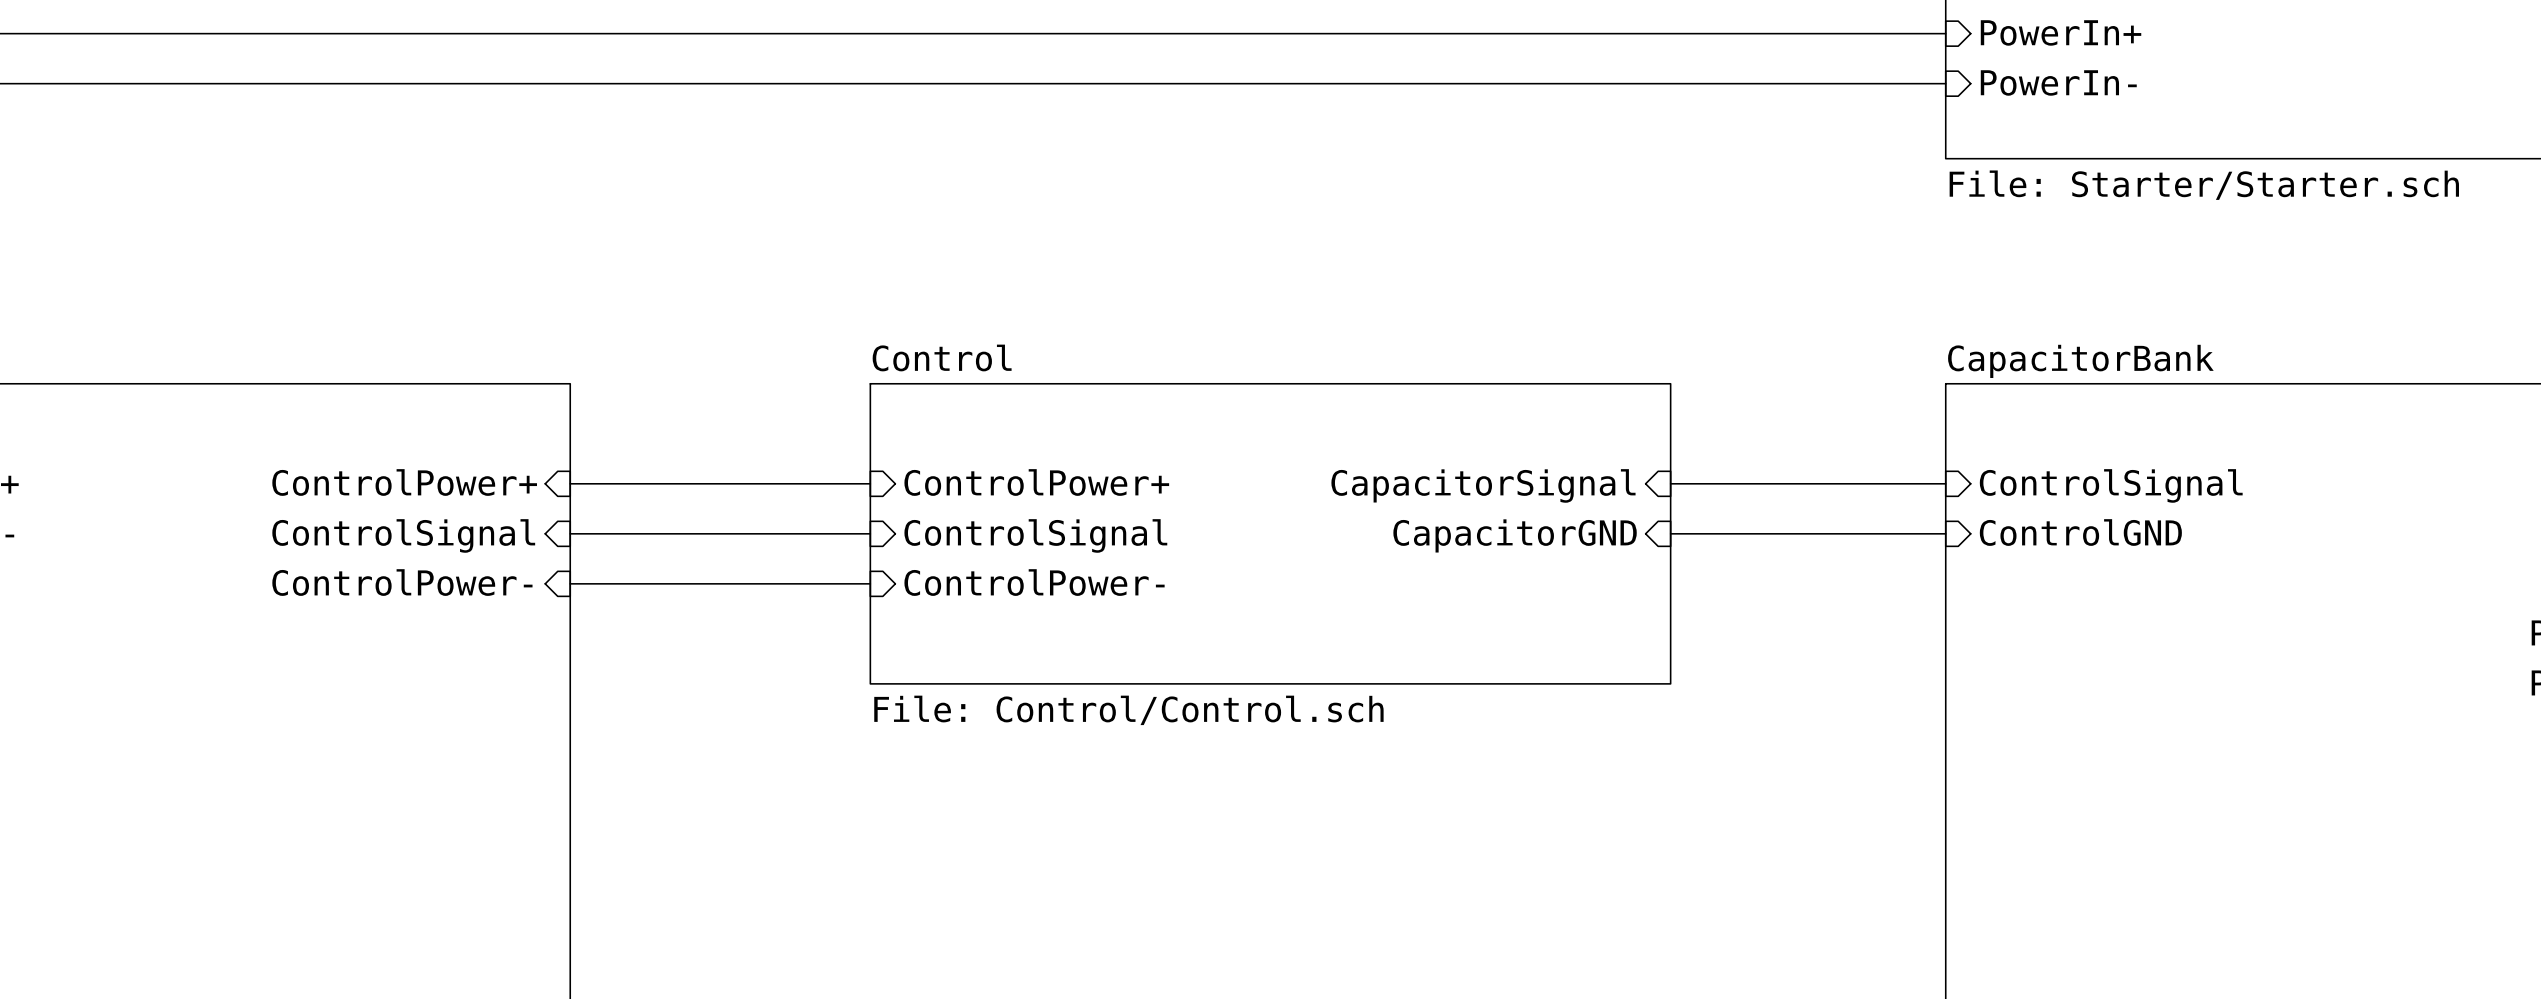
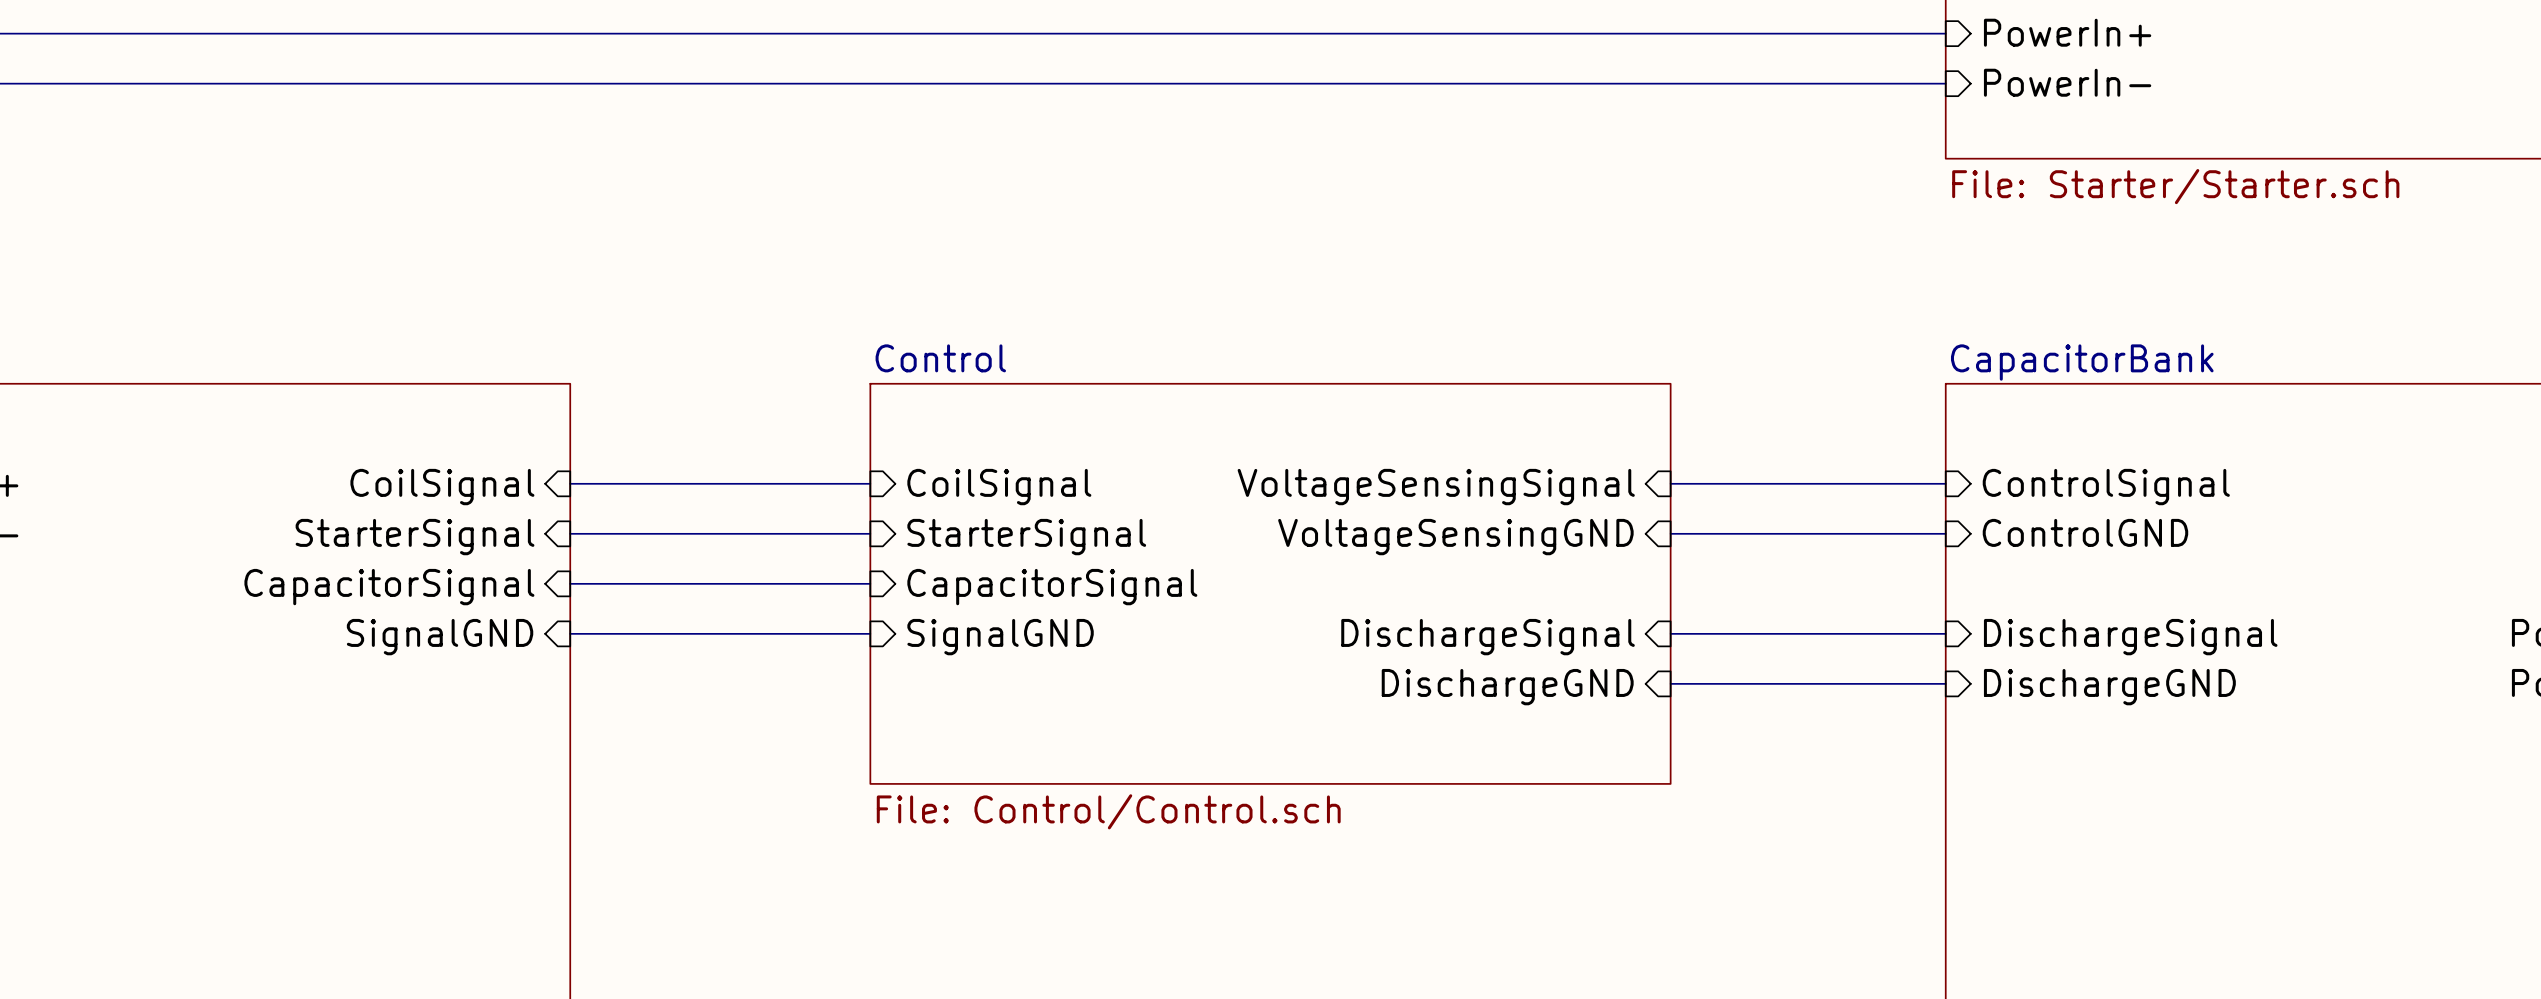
sheet pin: ControlPower+ (404, 482) -> CoilSignal (442, 487)
sheet pin: ControlPower+ (1036, 482) -> CoilSignal (999, 487)
sheet pin: CapacitorSignal (1483, 485) -> VoltageSensingSignal (1436, 487)
sheet Control: File: Control/Control.sch (1270, 533) -> none
sheet pin: ControlSignal (403, 535) -> StarterSignal (415, 537)
sheet pin: ControlSignal (1035, 535) -> StarterSignal (1026, 537)
sheet pin: CapacitorGND (1515, 535) -> VoltageSensingGND (1455, 537)
sheet pin: ControlPower- (402, 582) -> CapacitorSignal (389, 587)
sheet pin: ControlPower- (1034, 582) -> CapacitorSignal (1052, 587)
sheet Control: none -> File: Control/Control.sch (1270, 583)
wire: none -> (570, 633) (870, 633)
wire: none -> (1670, 633) (1945, 633)
sheet pin: none -> SignalGND (440, 637)
sheet pin: none -> SignalGND (1000, 637)
sheet pin: none -> DischargeSignal (1488, 637)
sheet pin: none -> DischargeSignal (2130, 637)
wire: none -> (1670, 683) (1945, 683)
sheet pin: none -> DischargeGND (1507, 687)
sheet pin: none -> DischargeGND (2109, 687)

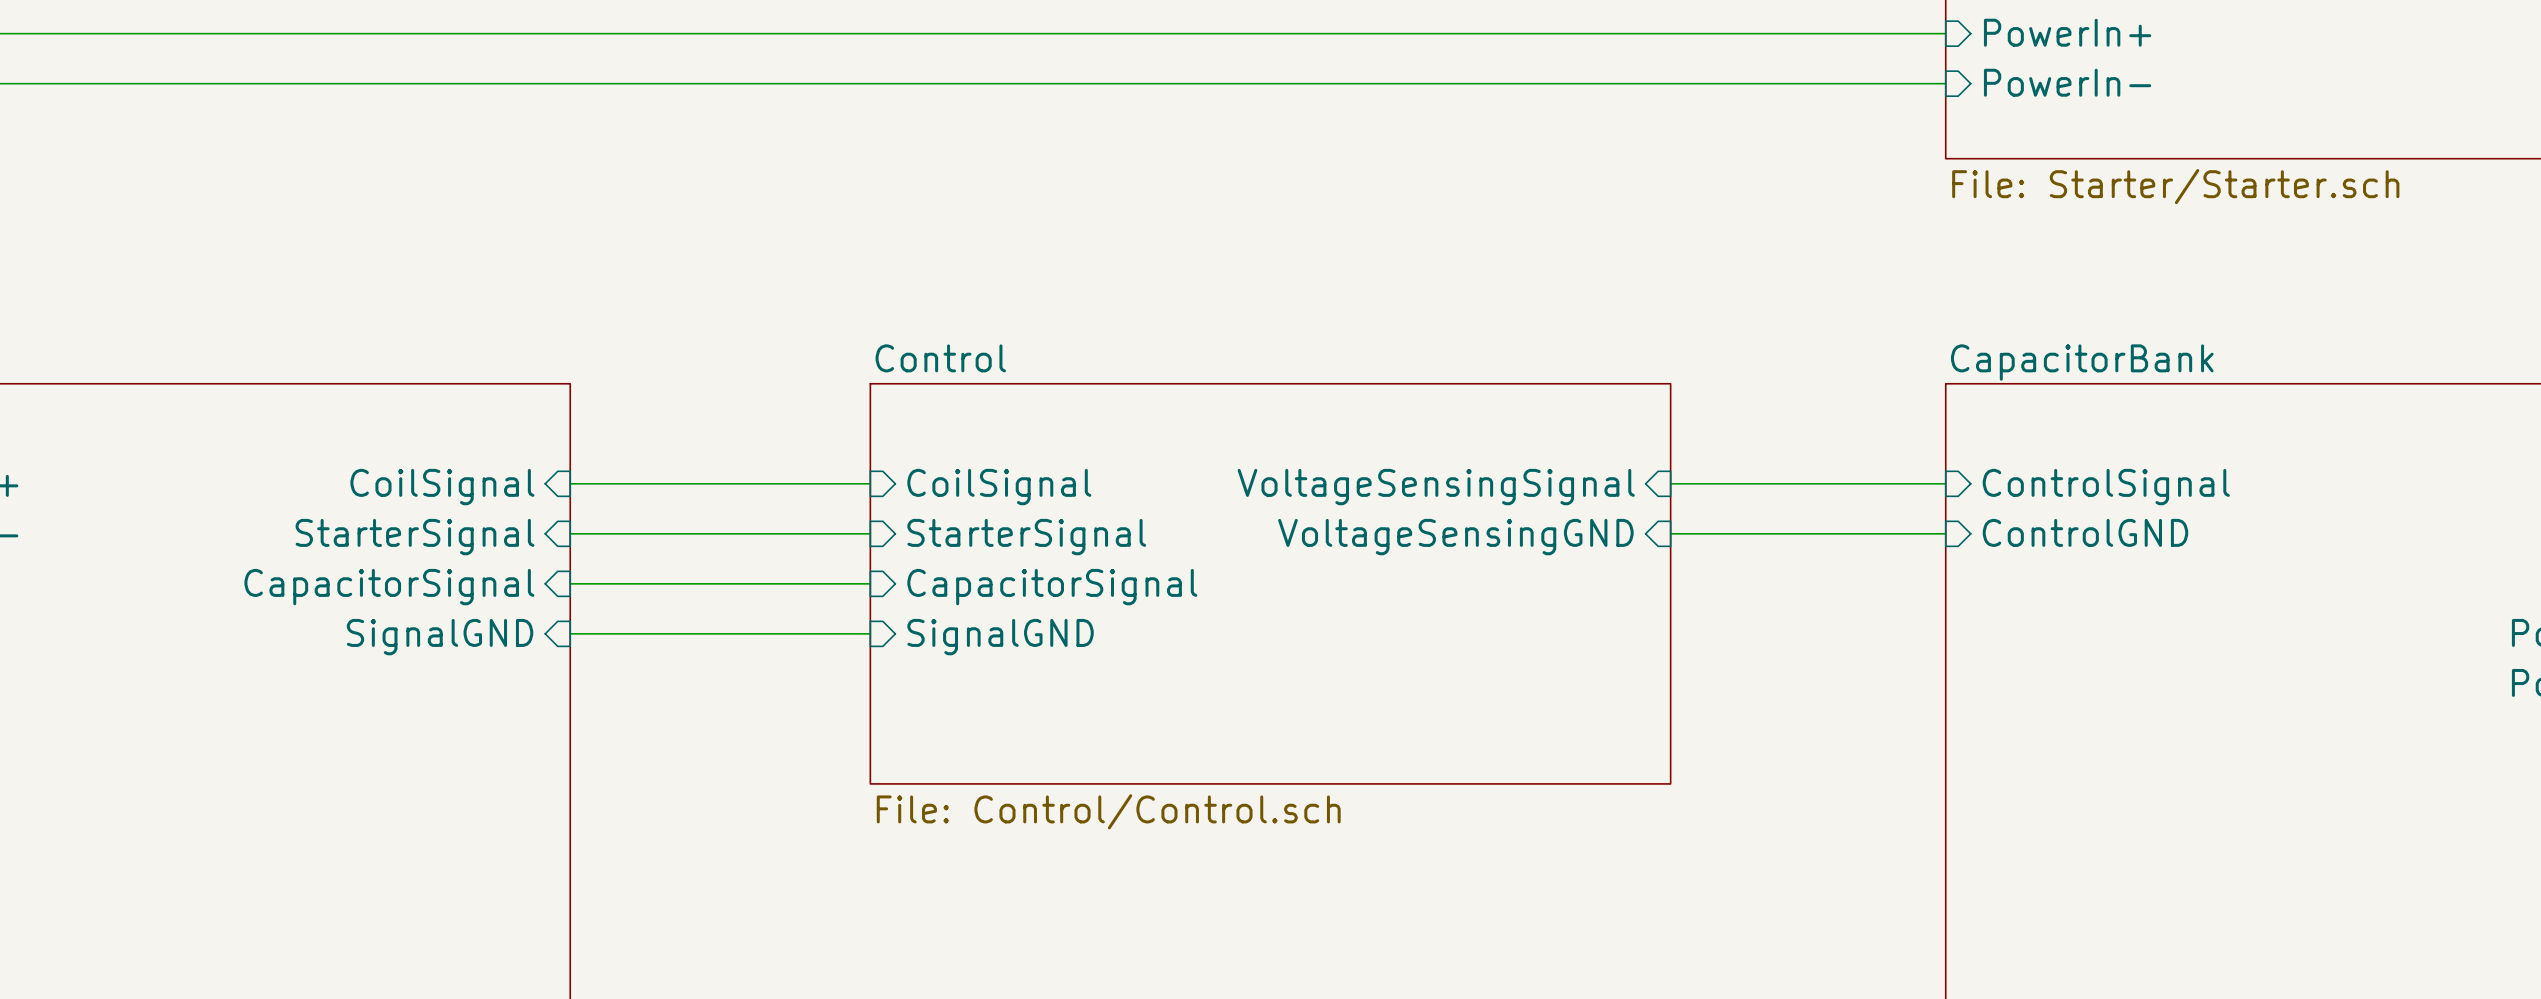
wire: (1670, 633) (1945, 633) -> none
sheet pin: DischargeSignal (1488, 637) -> none
sheet pin: DischargeSignal (2130, 637) -> none
wire: (1670, 683) (1945, 683) -> none
sheet pin: DischargeGND (1507, 687) -> none
sheet pin: DischargeGND (2109, 687) -> none

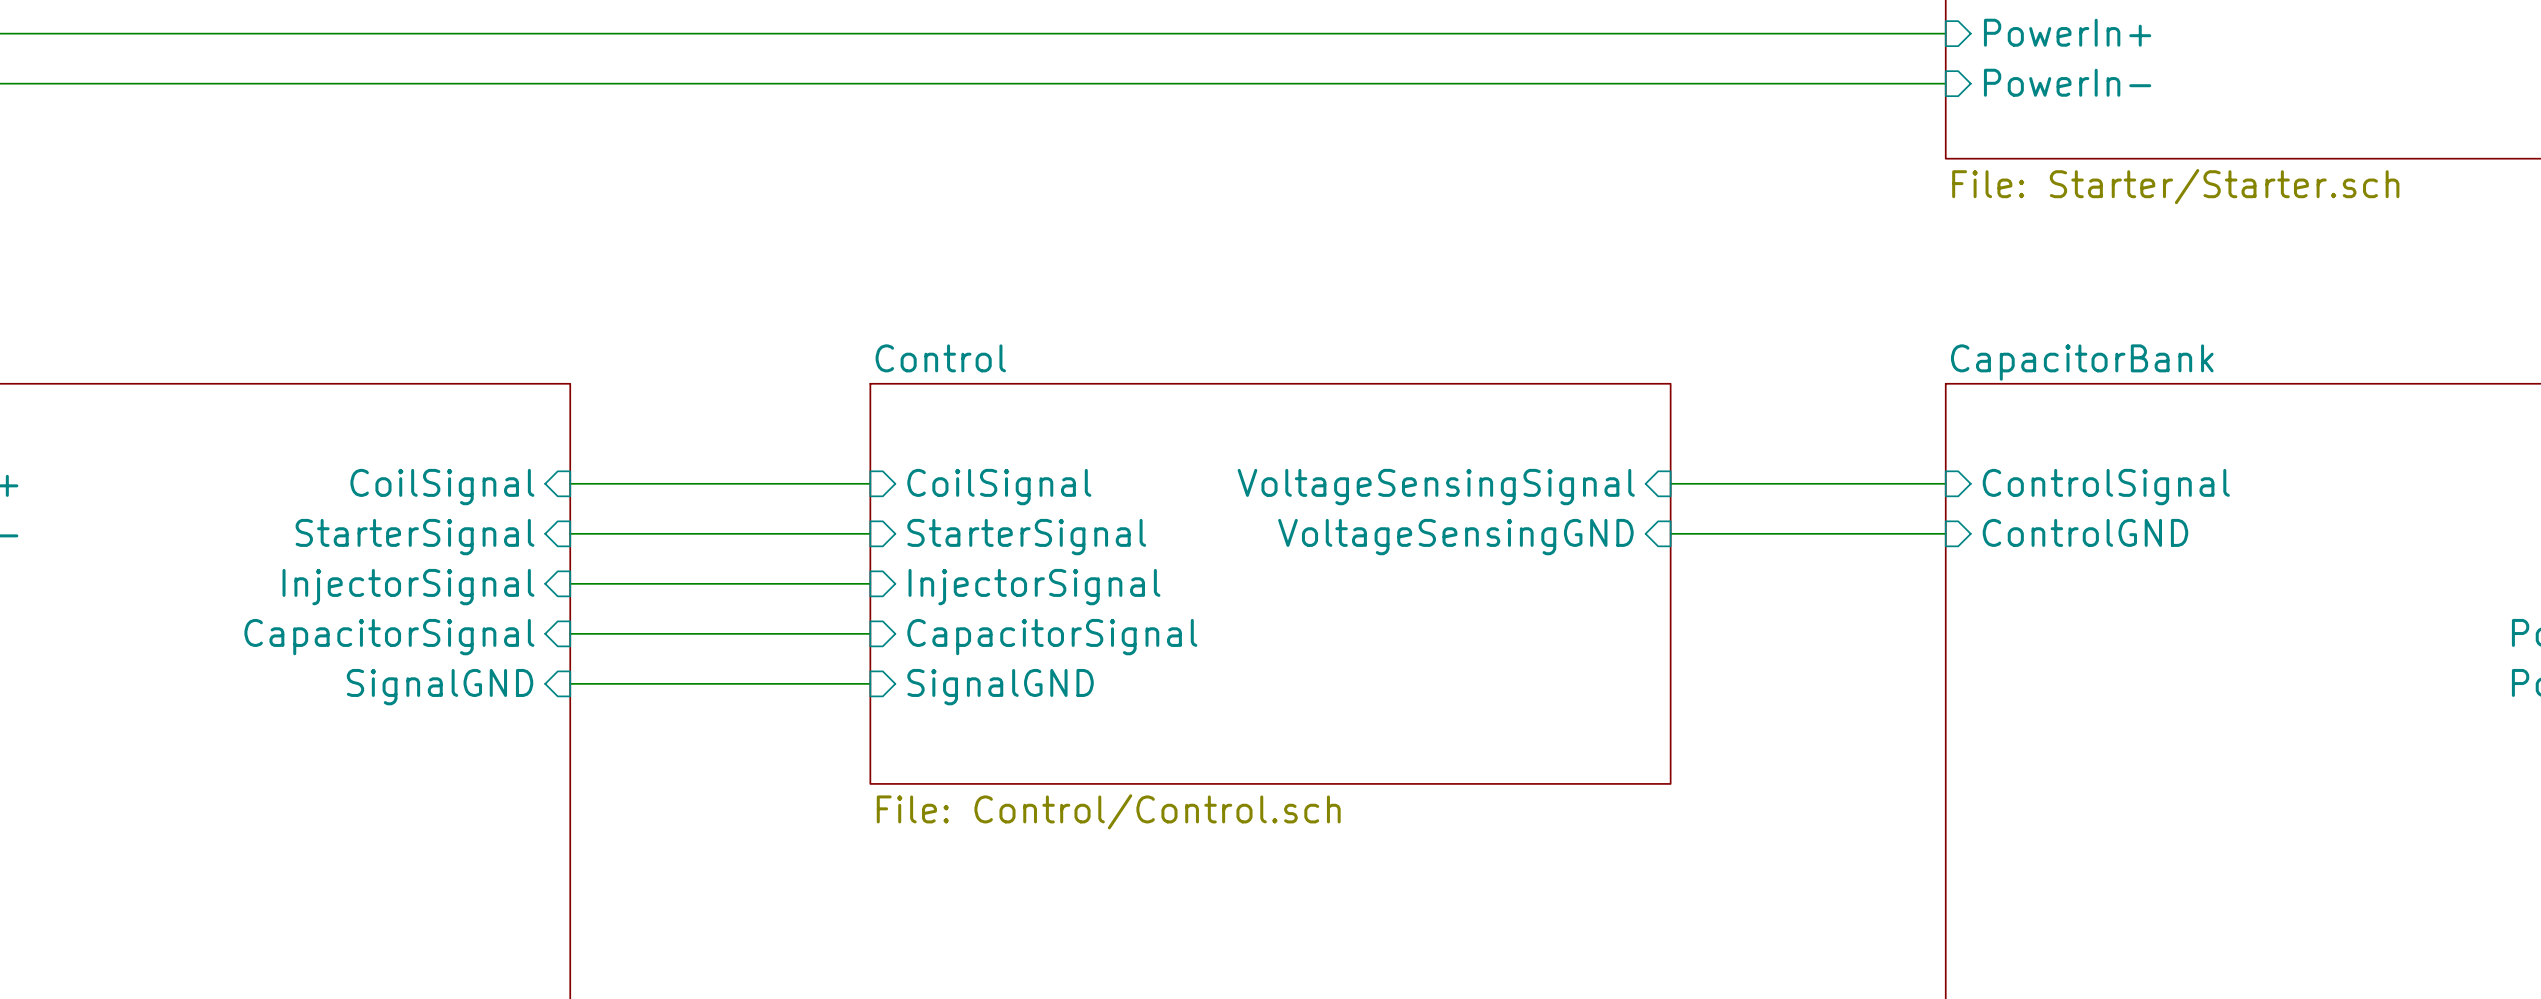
sheet pin: CapacitorSignal (389, 587) -> InjectorSignal (408, 587)
sheet pin: CapacitorSignal (1052, 587) -> InjectorSignal (1034, 587)
sheet pin: SignalGND (440, 637) -> CapacitorSignal (389, 637)
sheet pin: SignalGND (1000, 637) -> CapacitorSignal (1052, 637)
wire: none -> (570, 683) (870, 683)
sheet pin: none -> SignalGND (440, 687)
sheet pin: none -> SignalGND (1000, 687)

